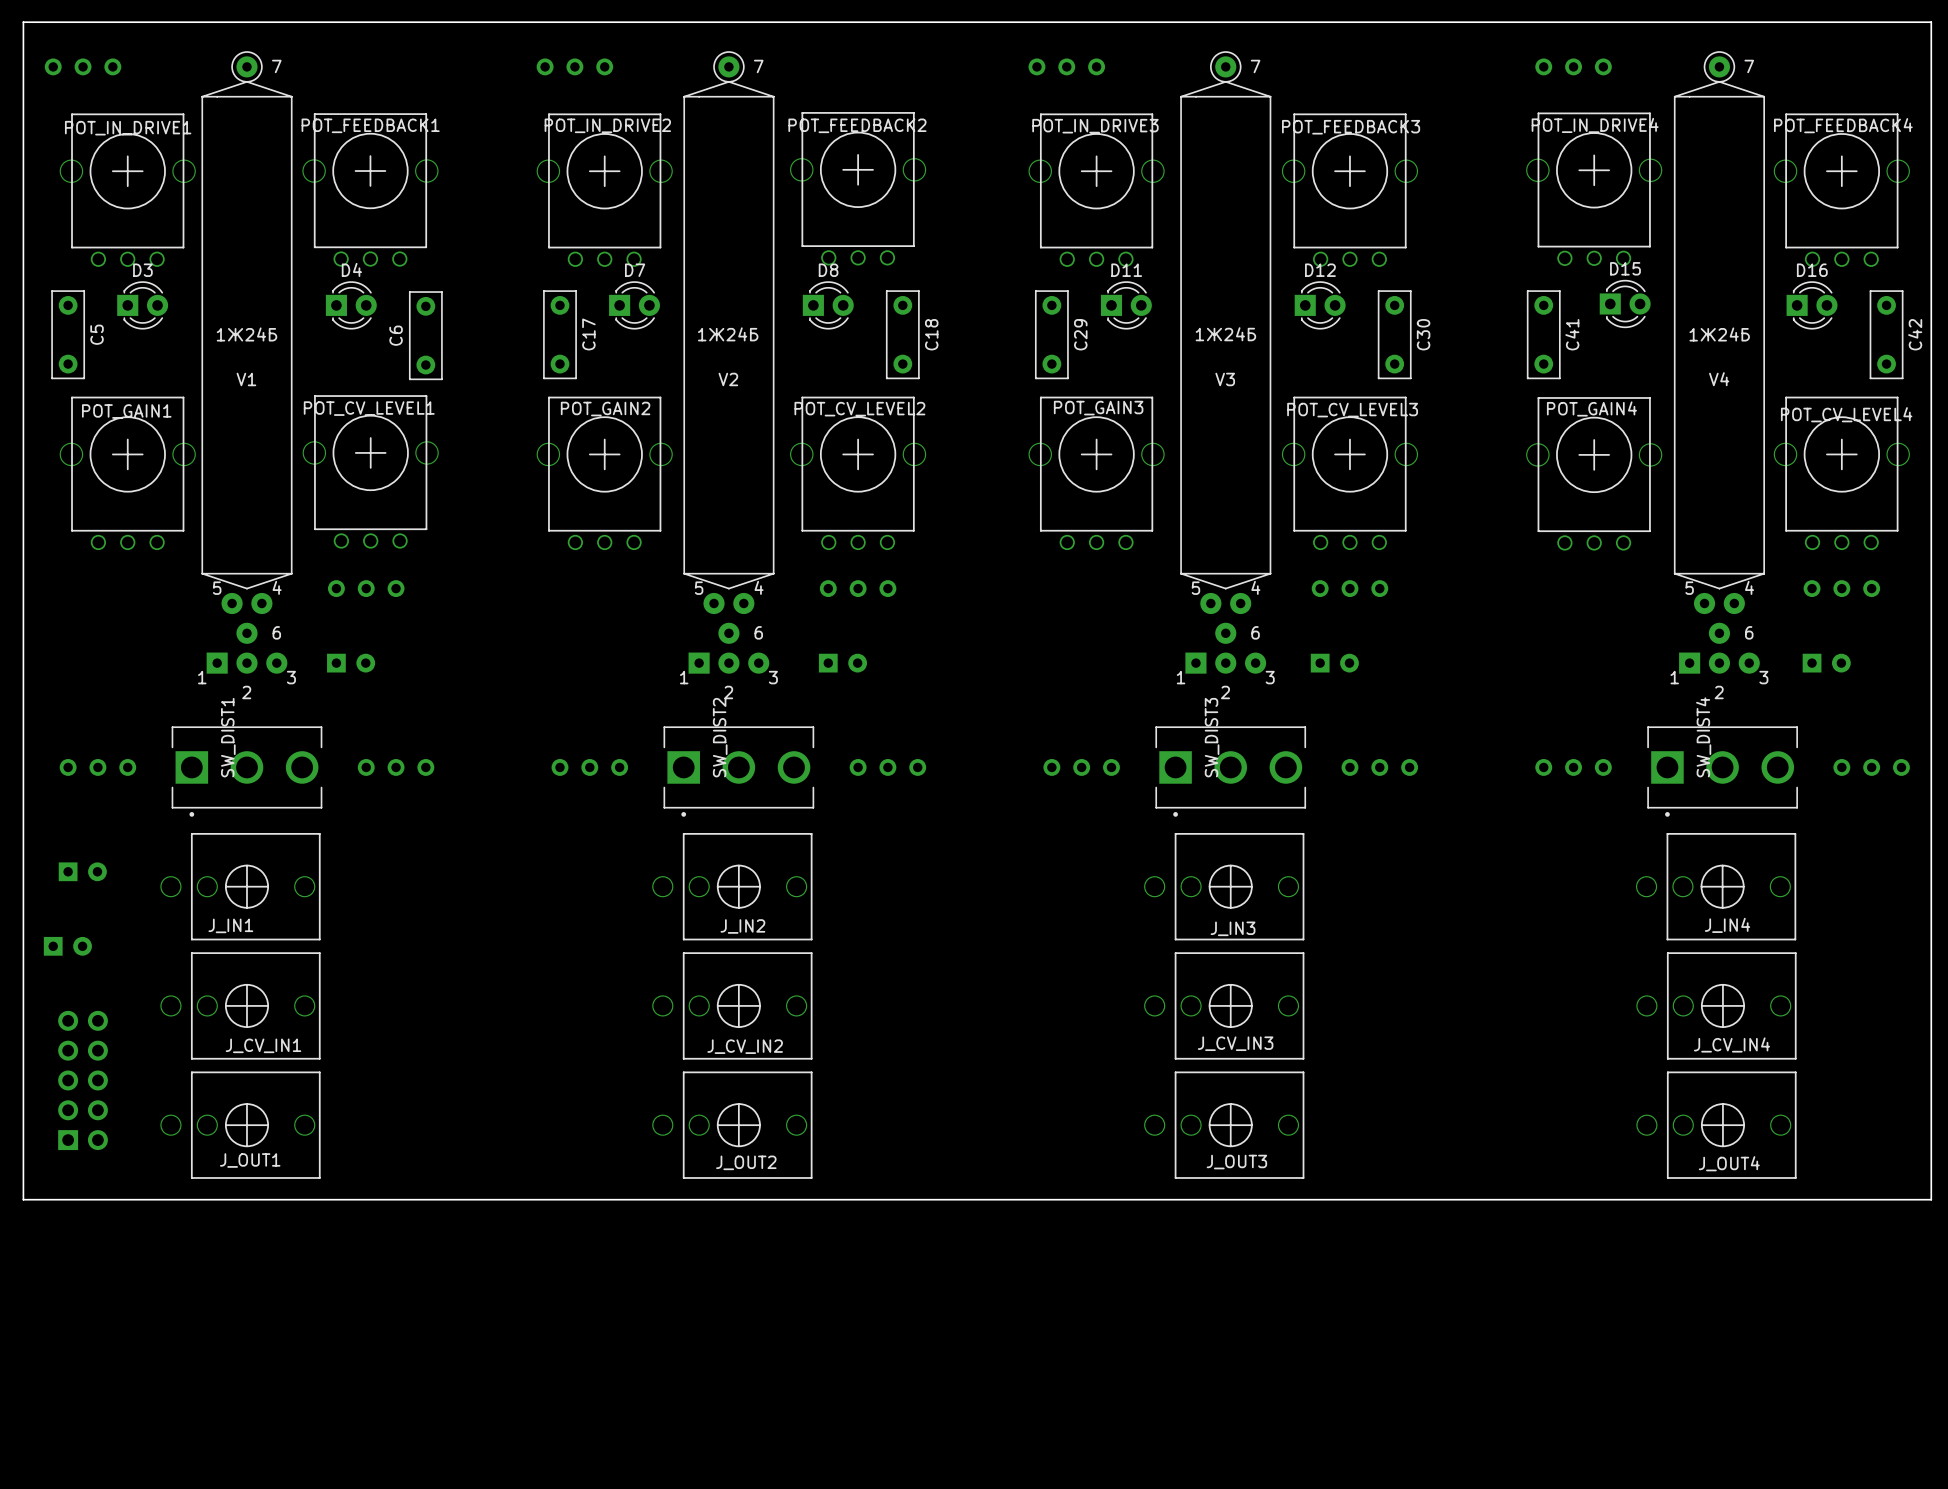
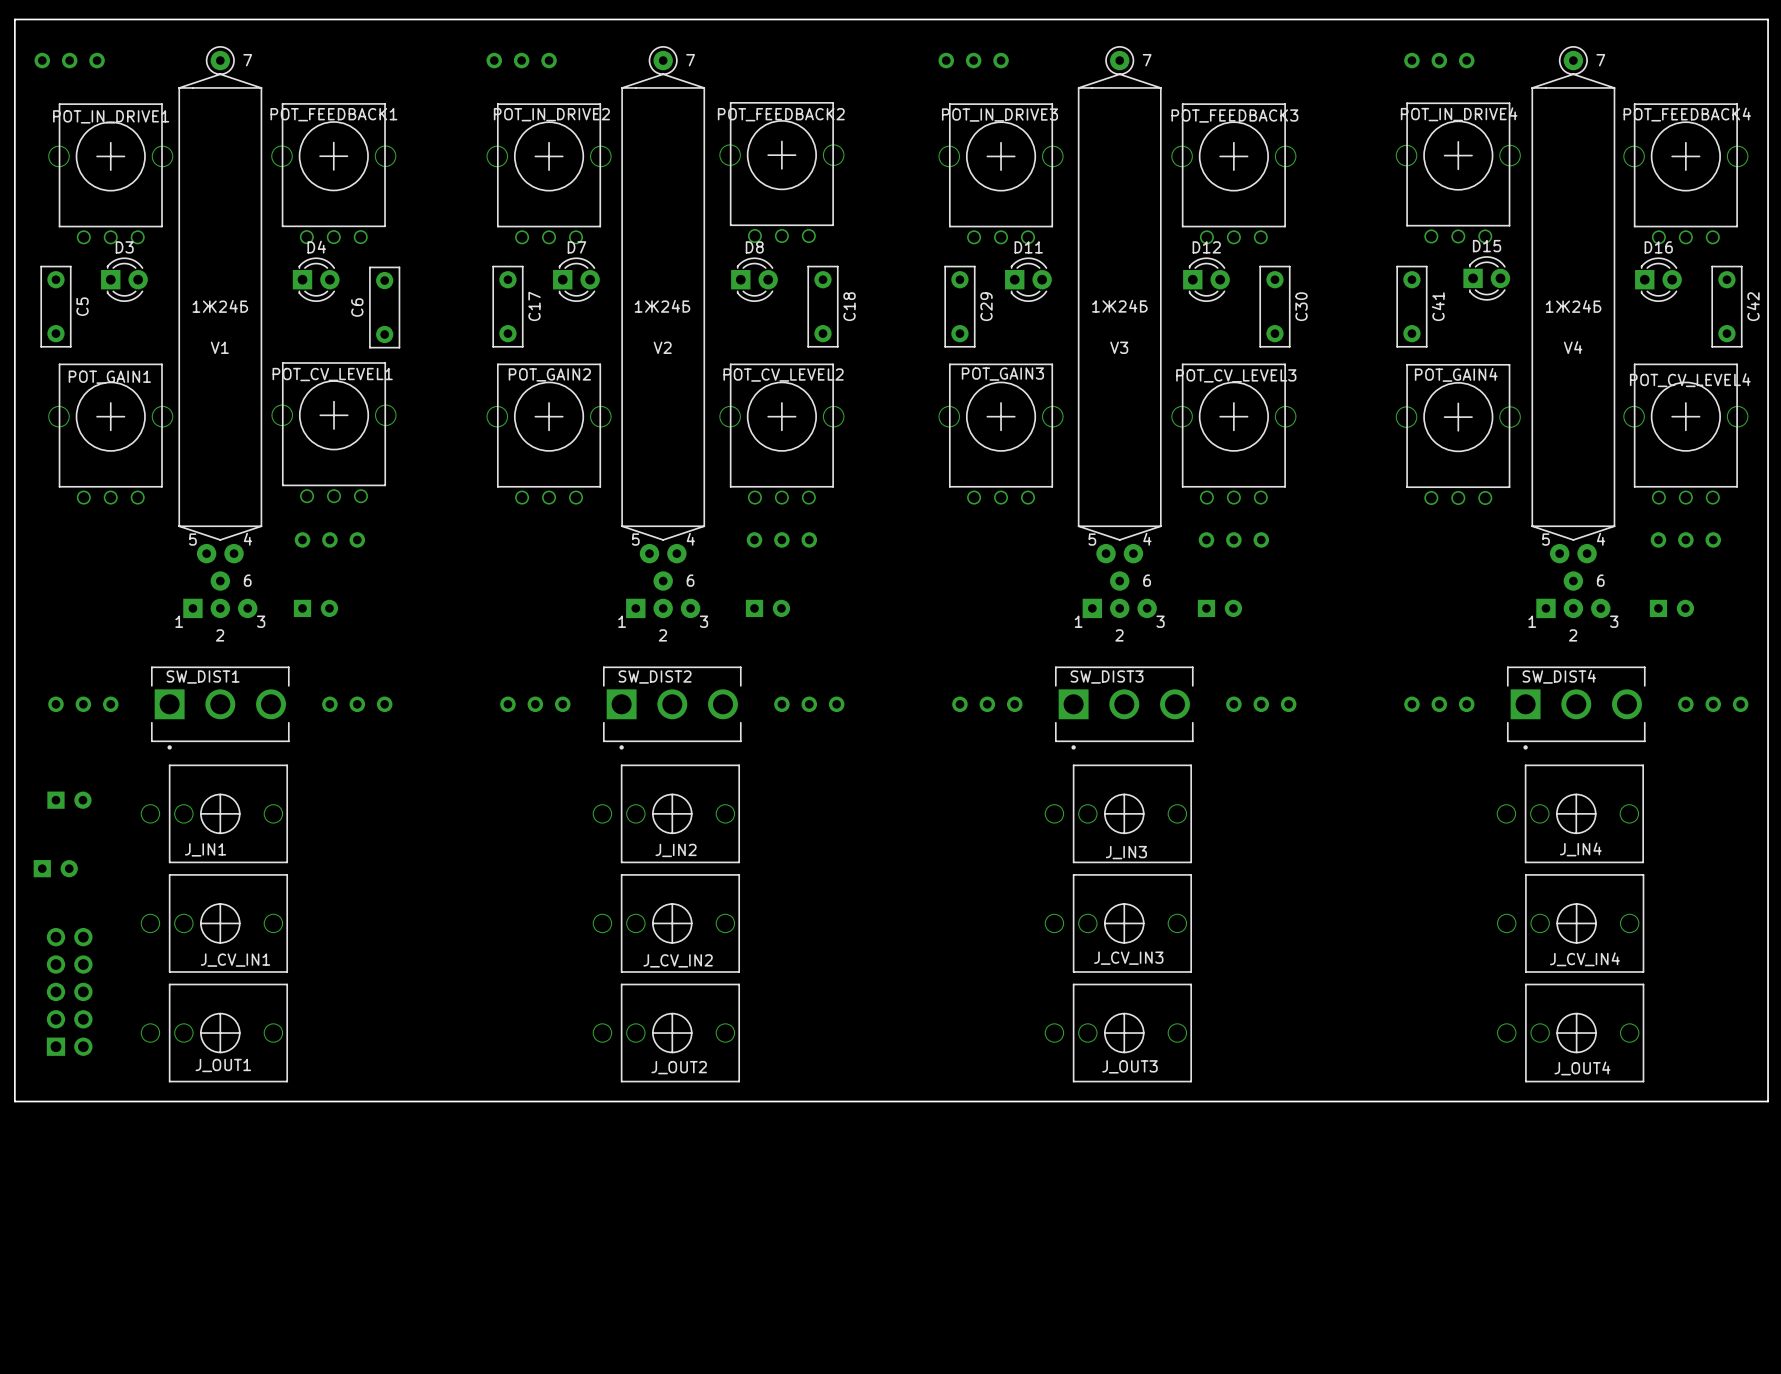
SW_DIST1 name rotation: 0° (228, 737) -> 90° clockwise (203, 677)
SW_DIST2 name rotation: 0° (720, 737) -> 90° clockwise (655, 677)
SW_DIST3 name rotation: 0° (1212, 737) -> 90° clockwise (1107, 677)
SW_DIST4 name rotation: 0° (1703, 737) -> 90° clockwise (1559, 676)

